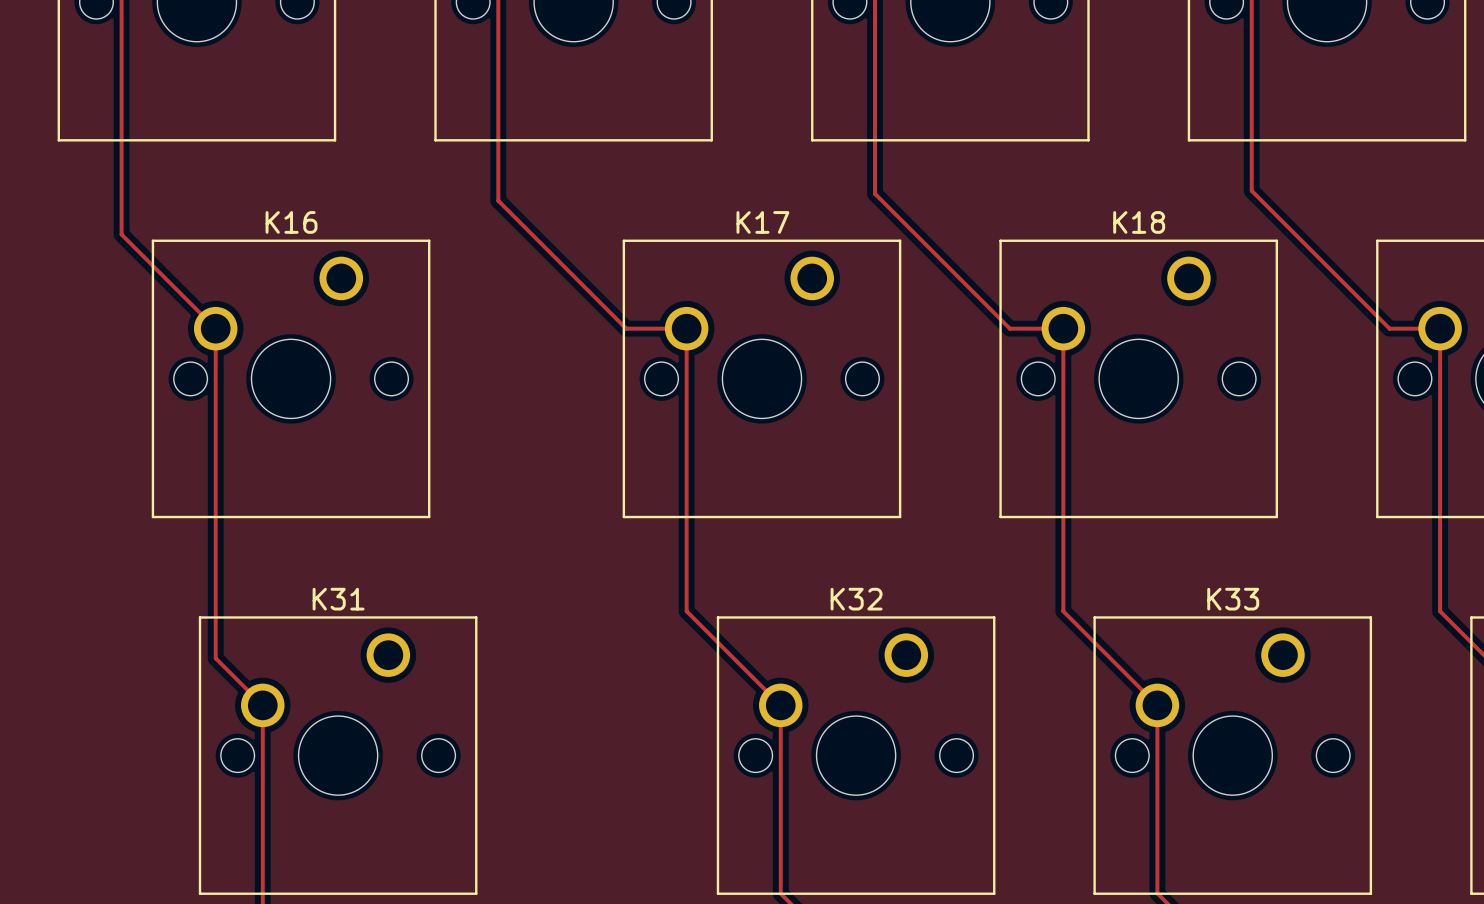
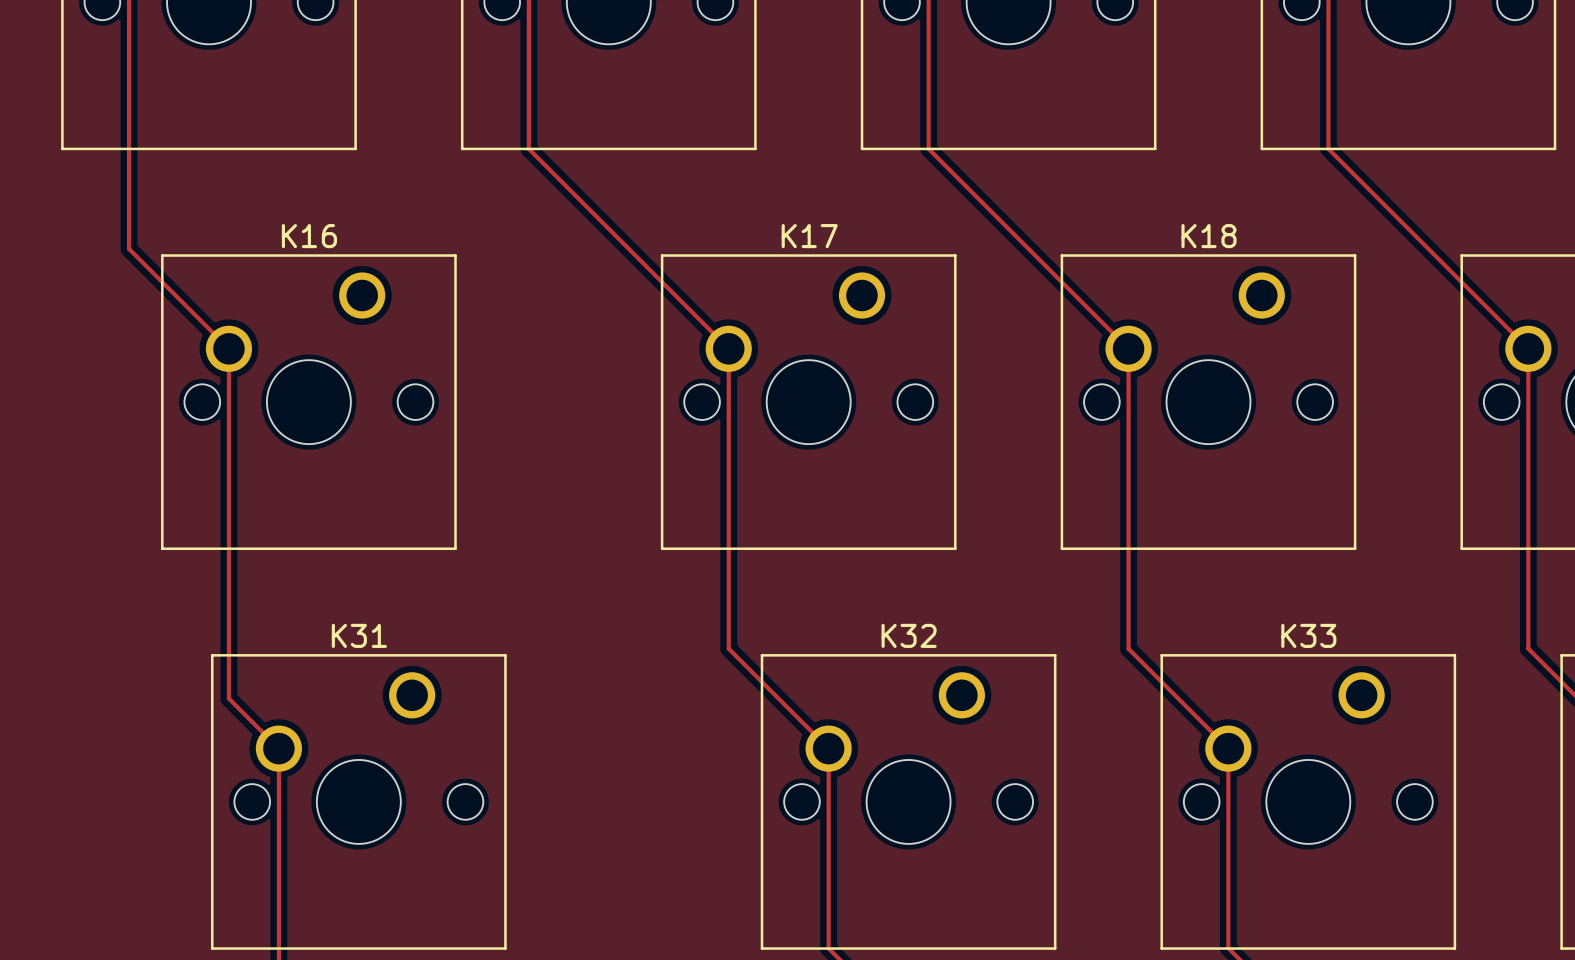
track: (498, 140) (498, 200) (626, 328) (686, 328) -> (528, 148) (728, 348)
track: (875, 140) (875, 193) (1009, 328) (1063, 328) -> (928, 148) (1128, 348)
track: (1251, 140) (1251, 190) (1389, 328) (1440, 328) -> (1328, 148) (1528, 348)

